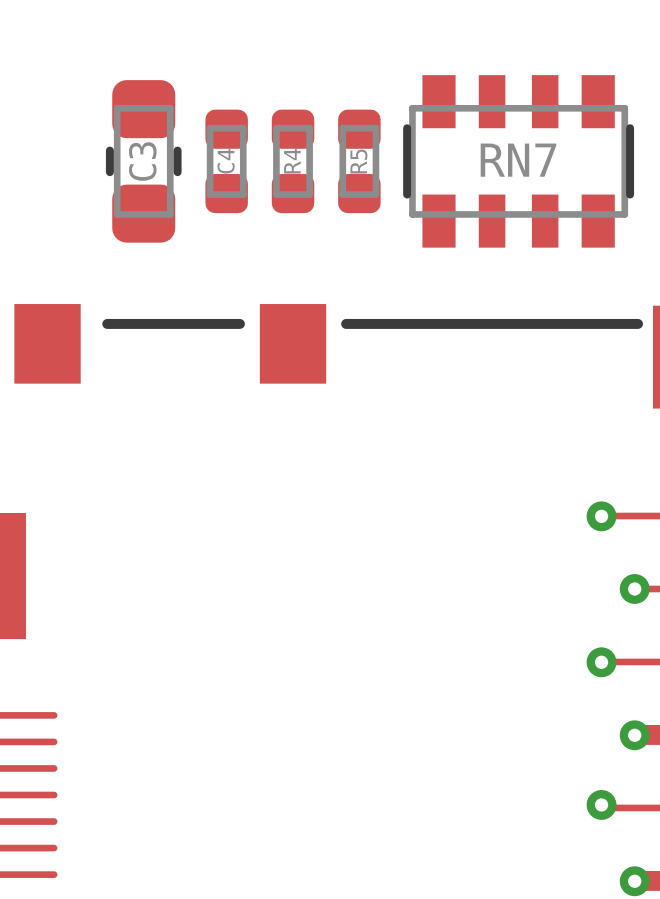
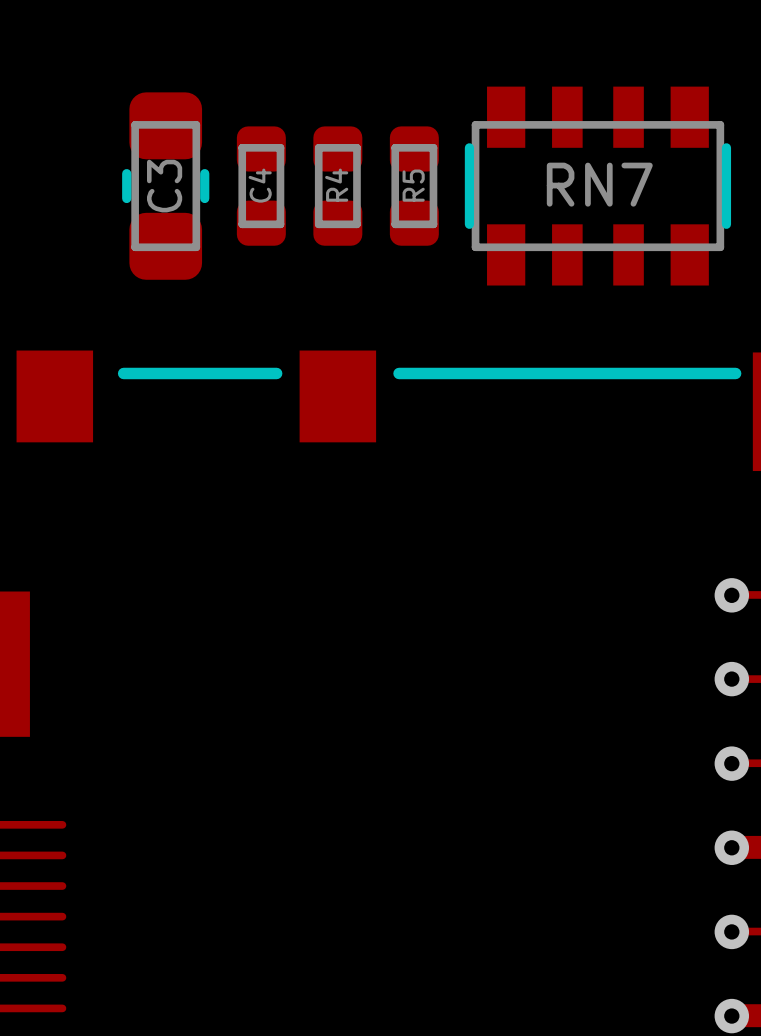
top track: (601, 516) (635, 516) -> none
via position: (601, 516) -> (731, 595)
top track: (601, 661) (635, 661) -> none
via position: (601, 662) -> (731, 763)
top track: (601, 804) (604, 807) (635, 807) -> none
via position: (601, 804) -> (731, 931)

